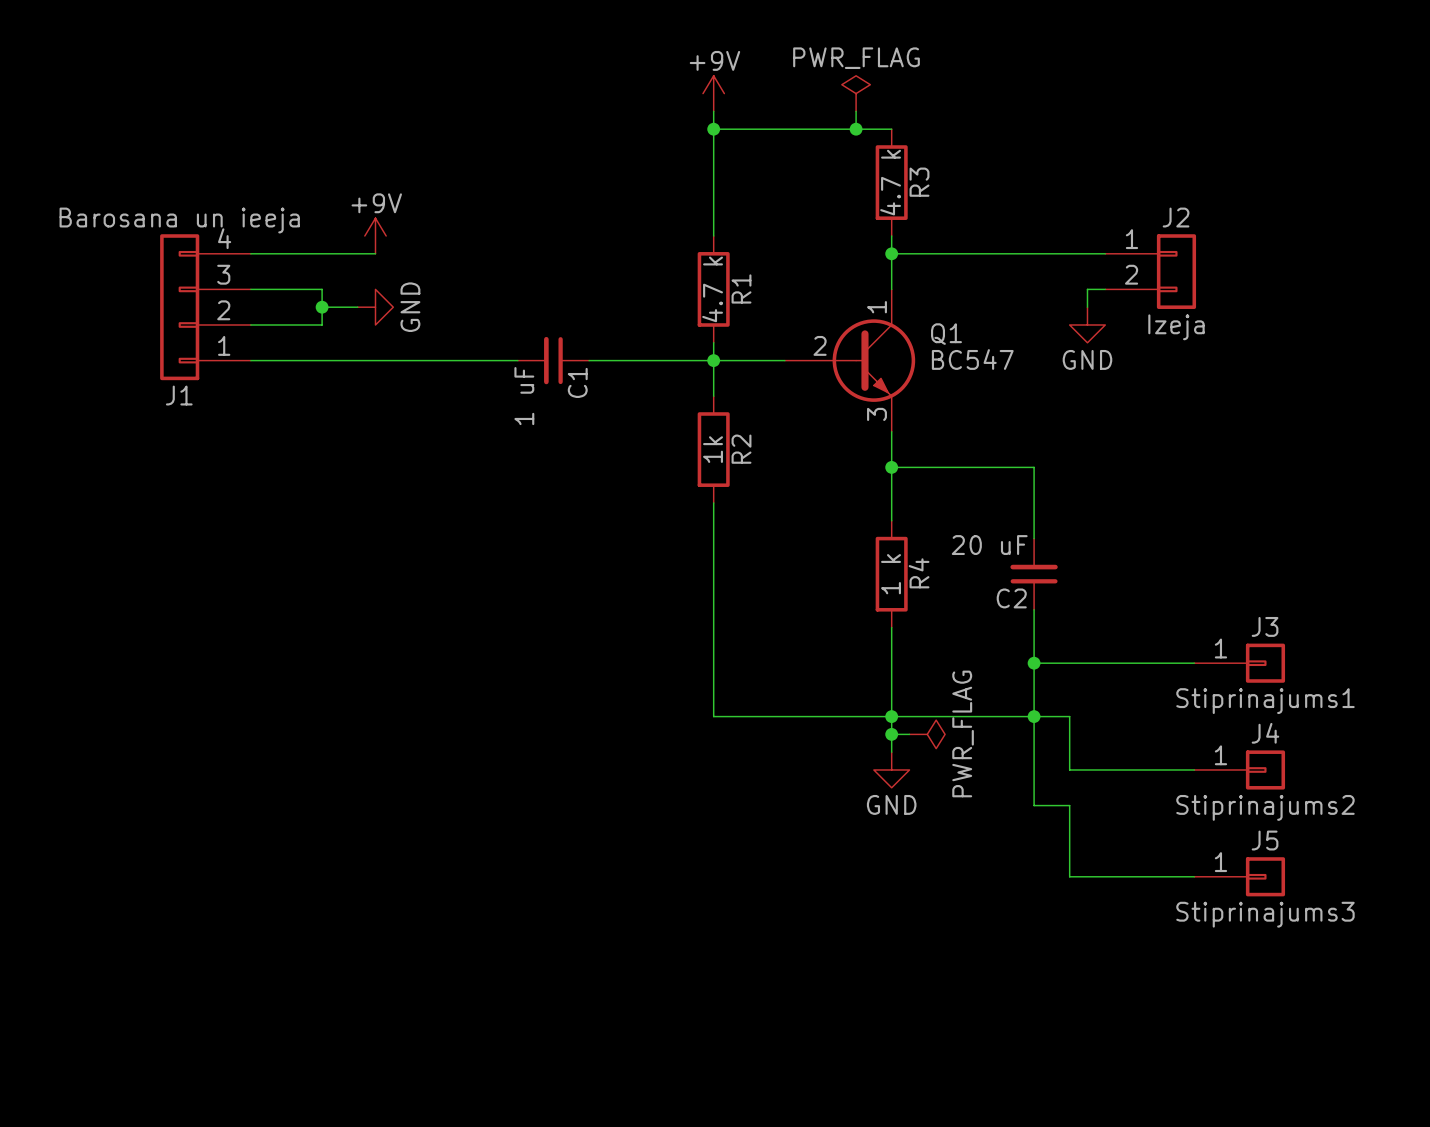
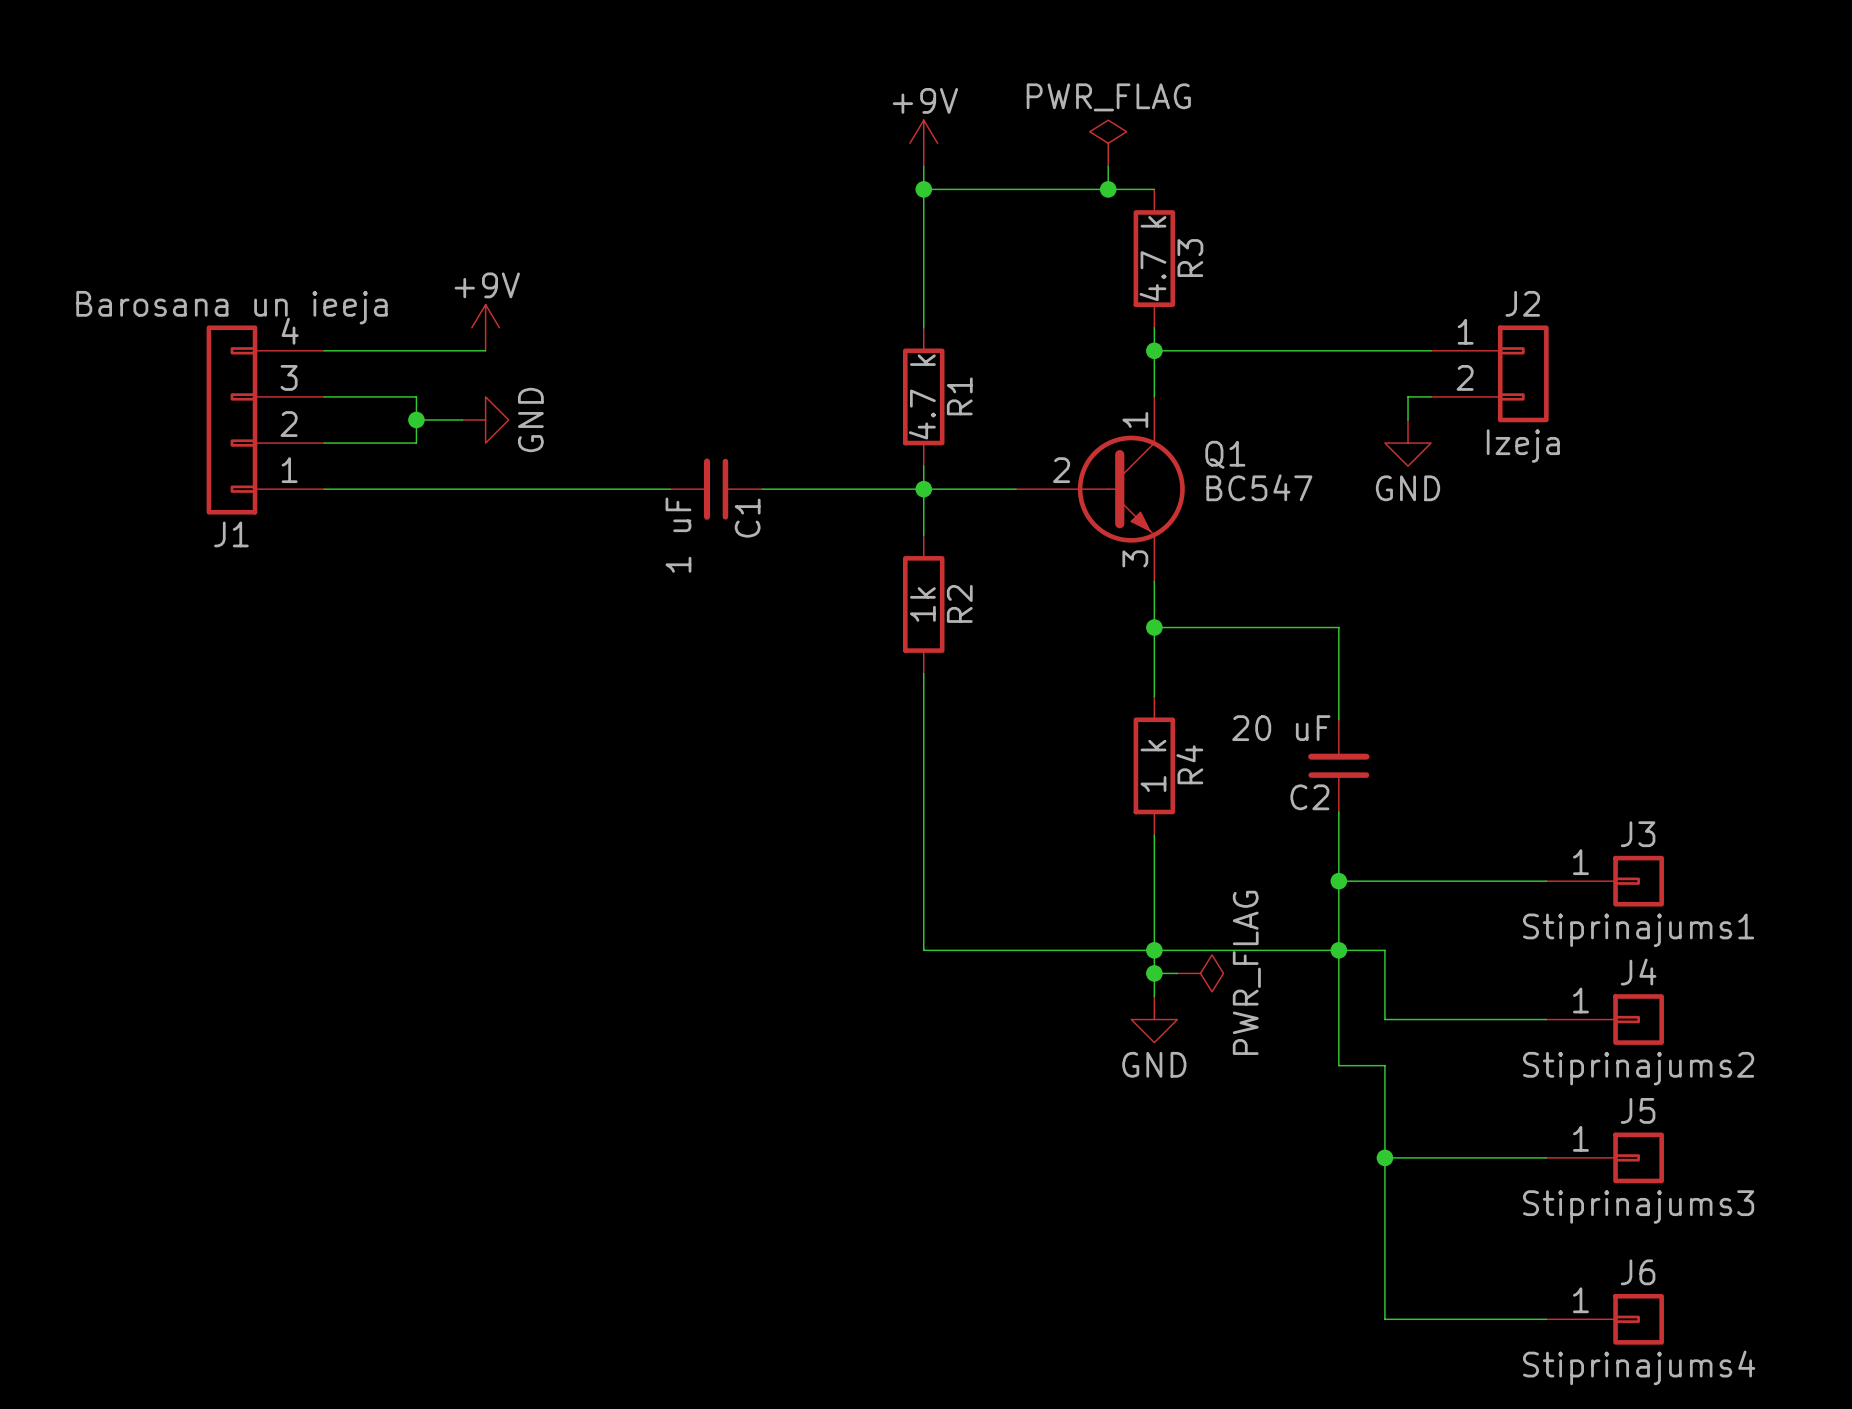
wire: none -> (1384, 1157) (1384, 1319) (1546, 1319)
junction: none -> (1384, 1157)
J6: none -> Stiprinajums4 (1605, 1319)

